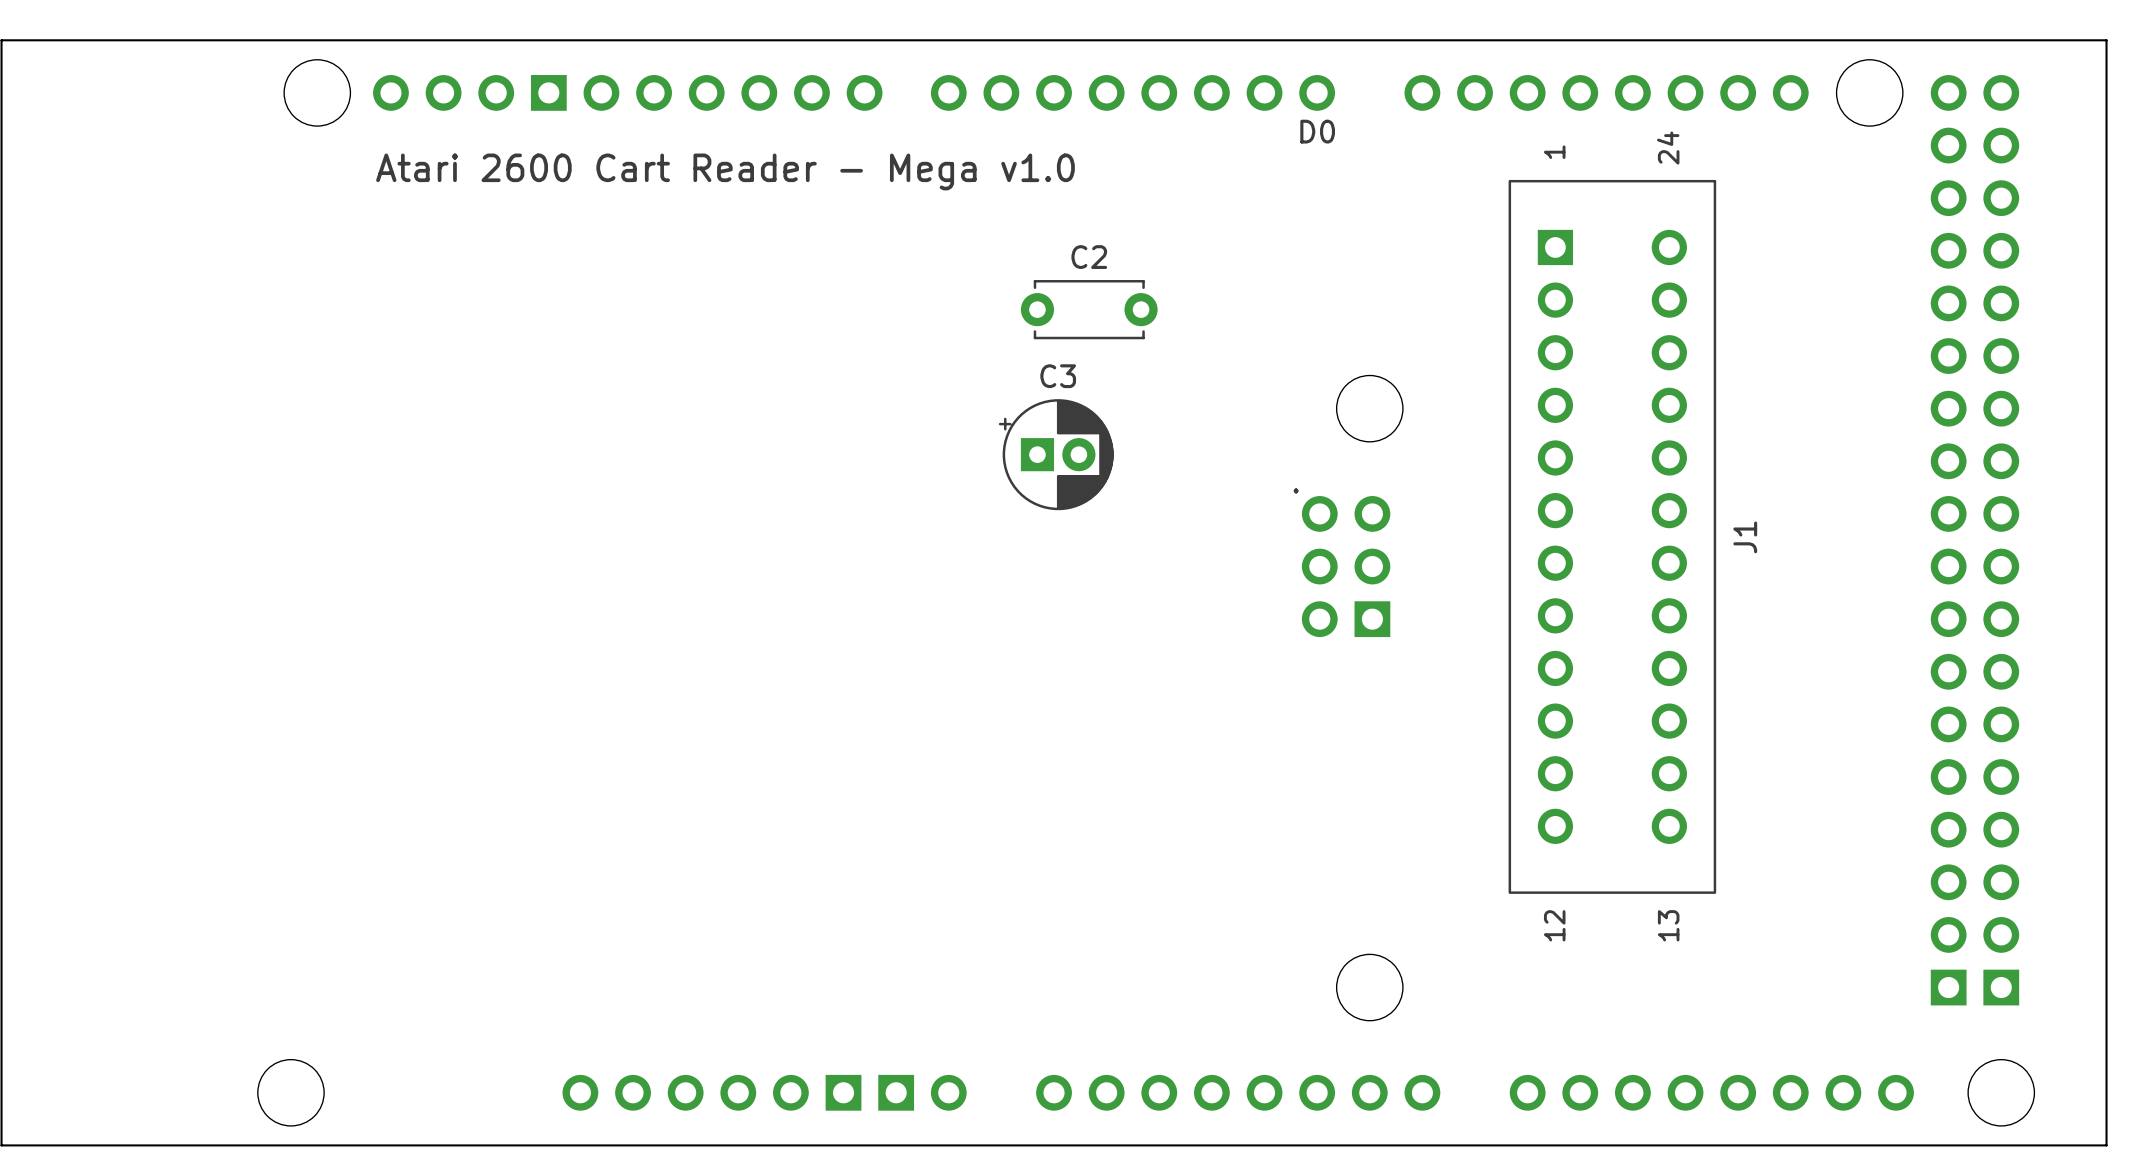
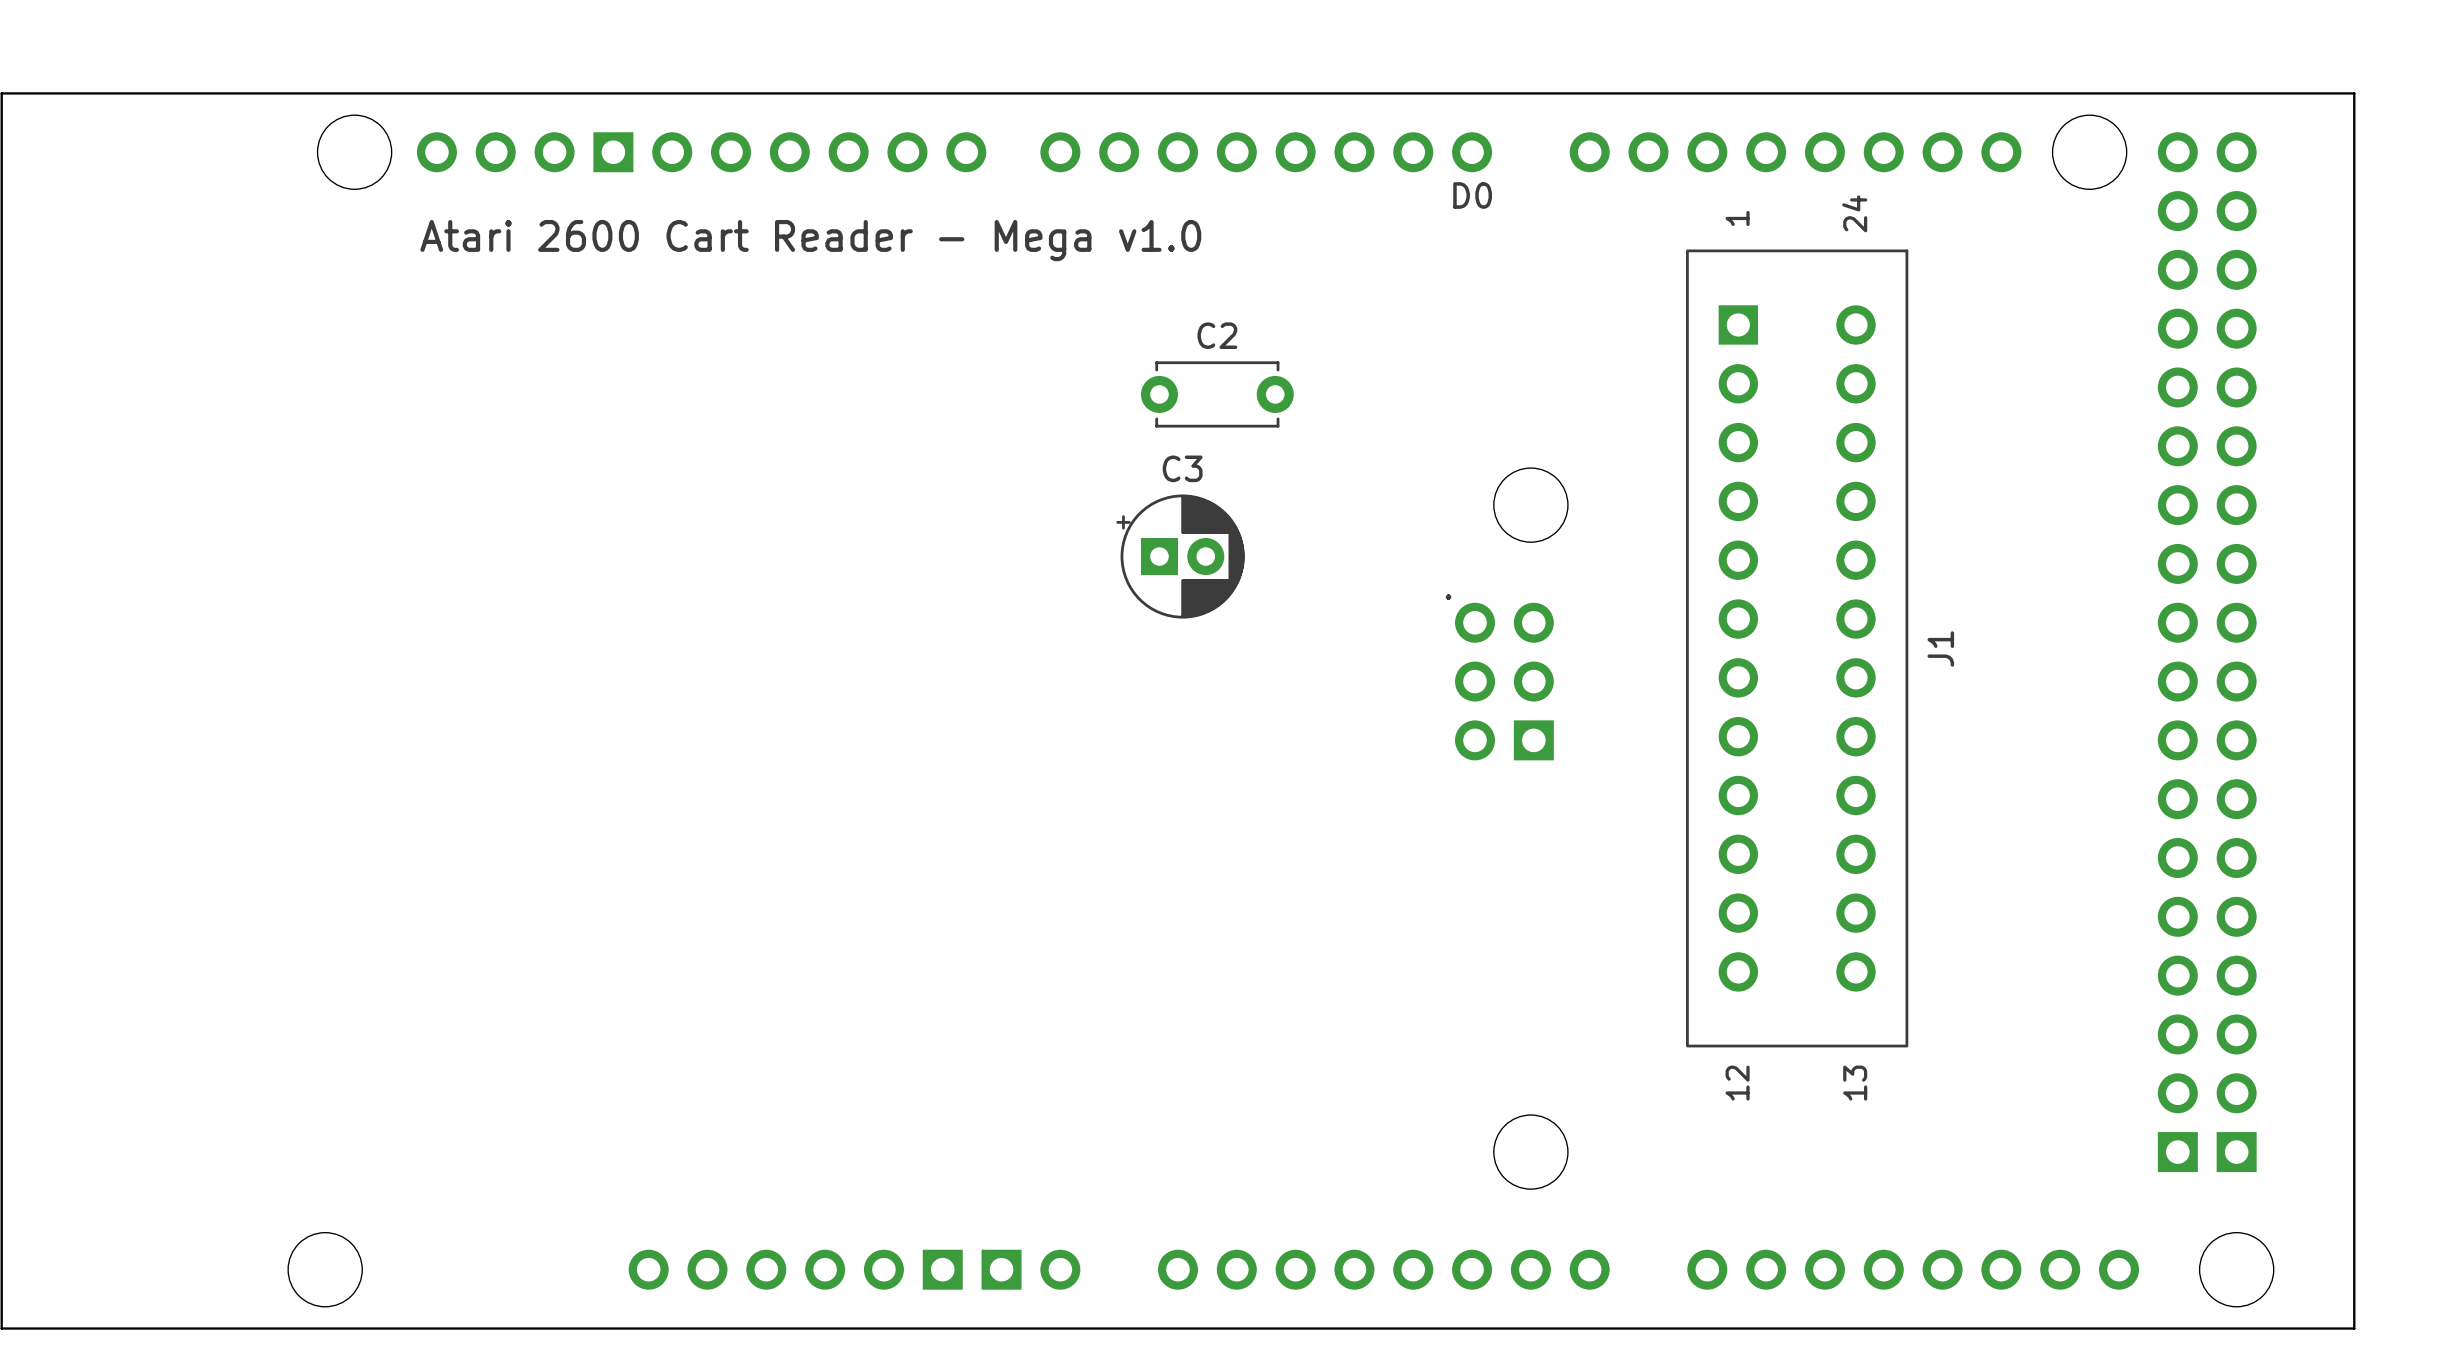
J1 footprint: [1508, 179, 1717, 894] -> [1686, 249, 1909, 1048]

